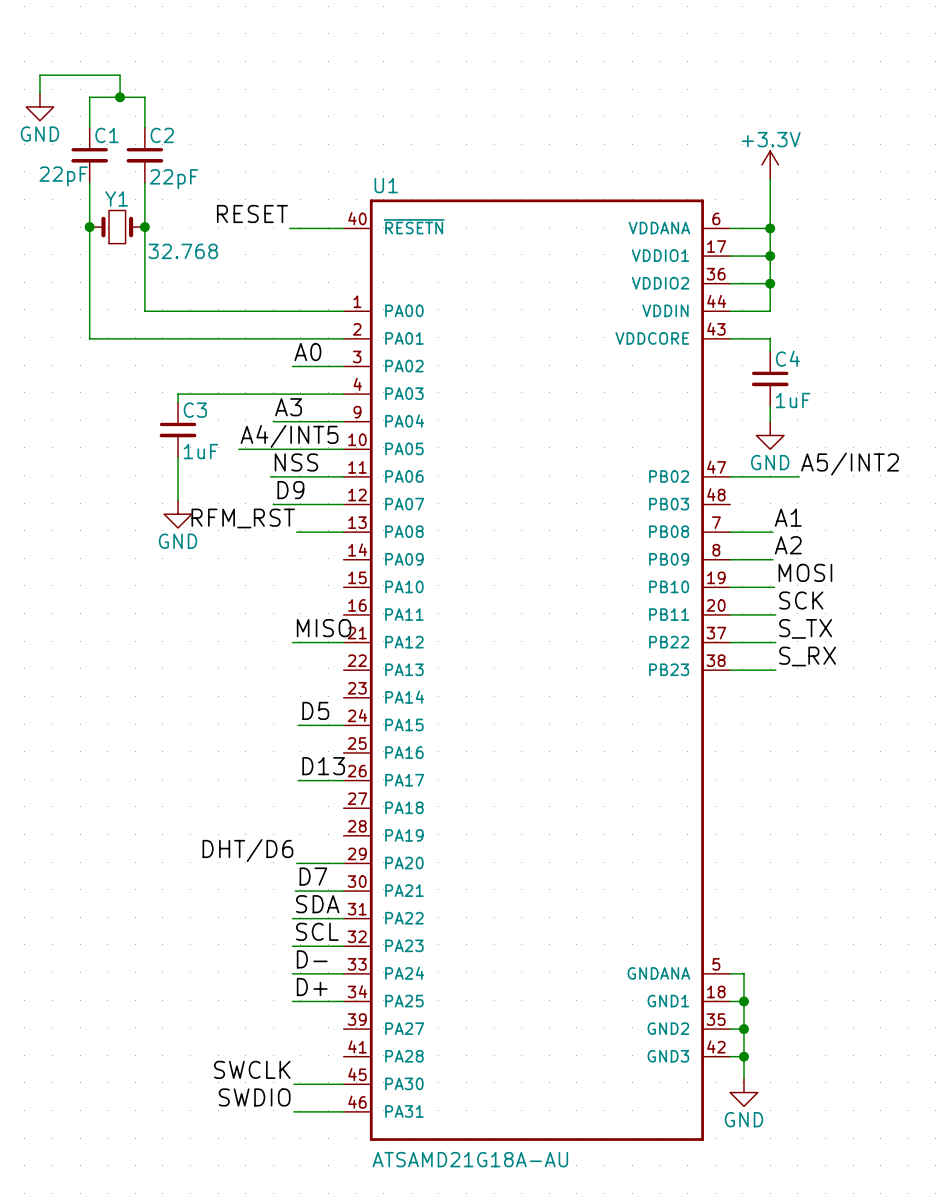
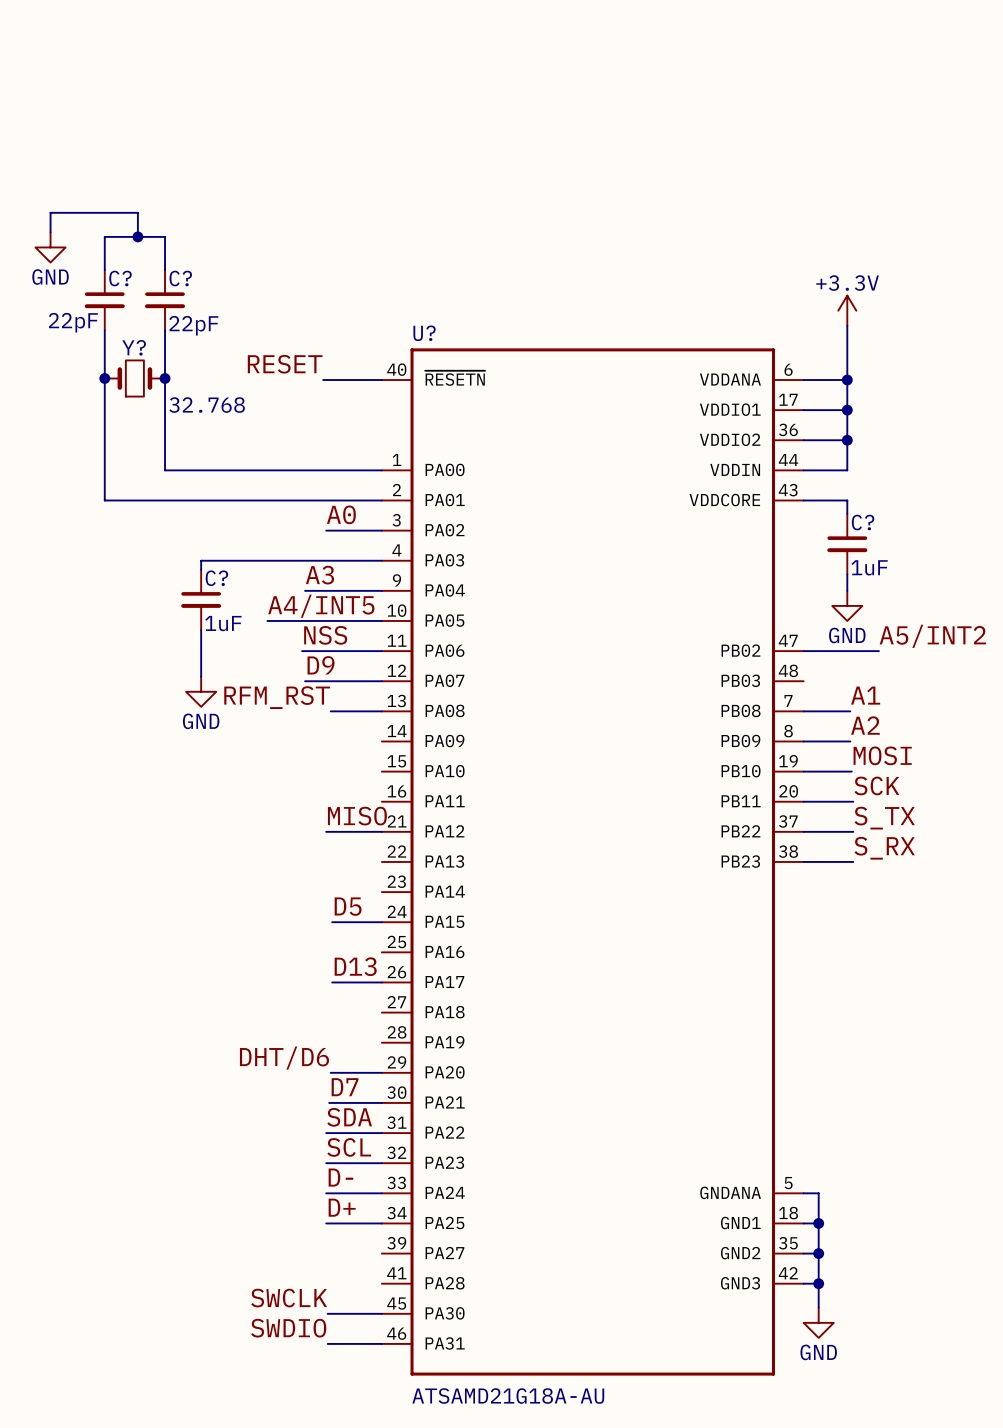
C1 name: C1 (107, 135) -> C? (120, 278)
C2 name: C2 (162, 135) -> C? (180, 278)
U1 name: U1 (386, 185) -> U? (424, 333)
Y1 name: Y1 (116, 198) -> Y? (134, 347)
C4 name: C4 (787, 358) -> C? (863, 522)
C3 name: C3 (195, 410) -> C? (216, 578)

